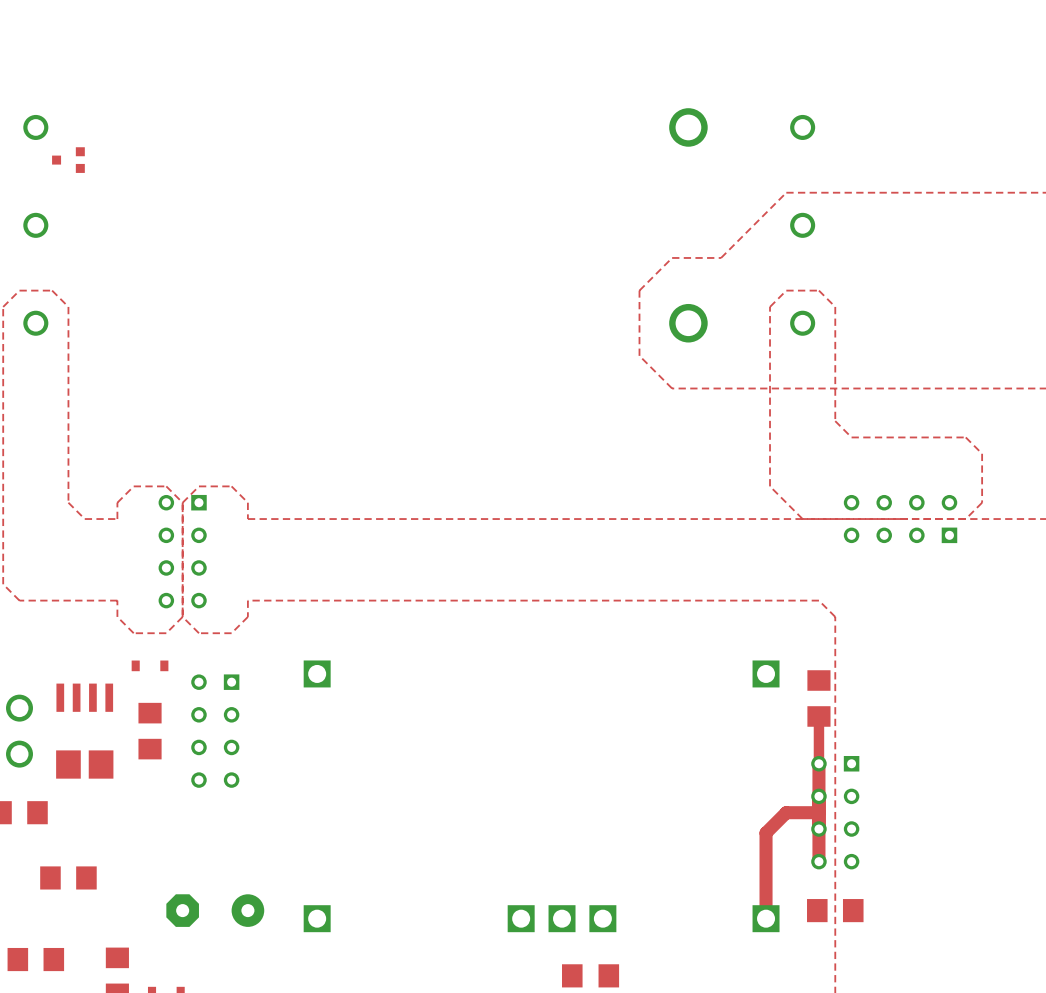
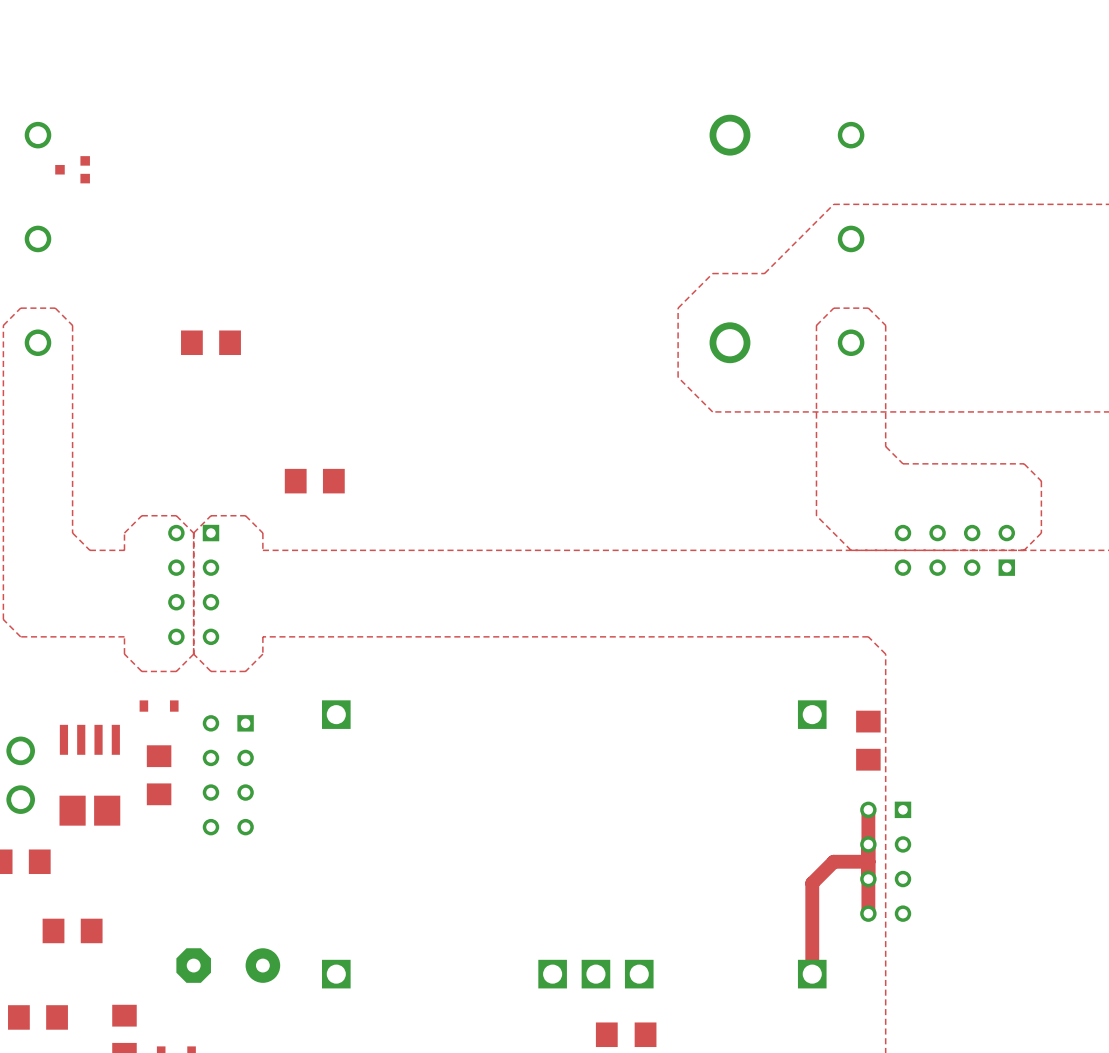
part: none -> (210, 342)
part: none -> (314, 481)
top track: (818, 716) (818, 763) -> none
part: (835, 910) -> none

